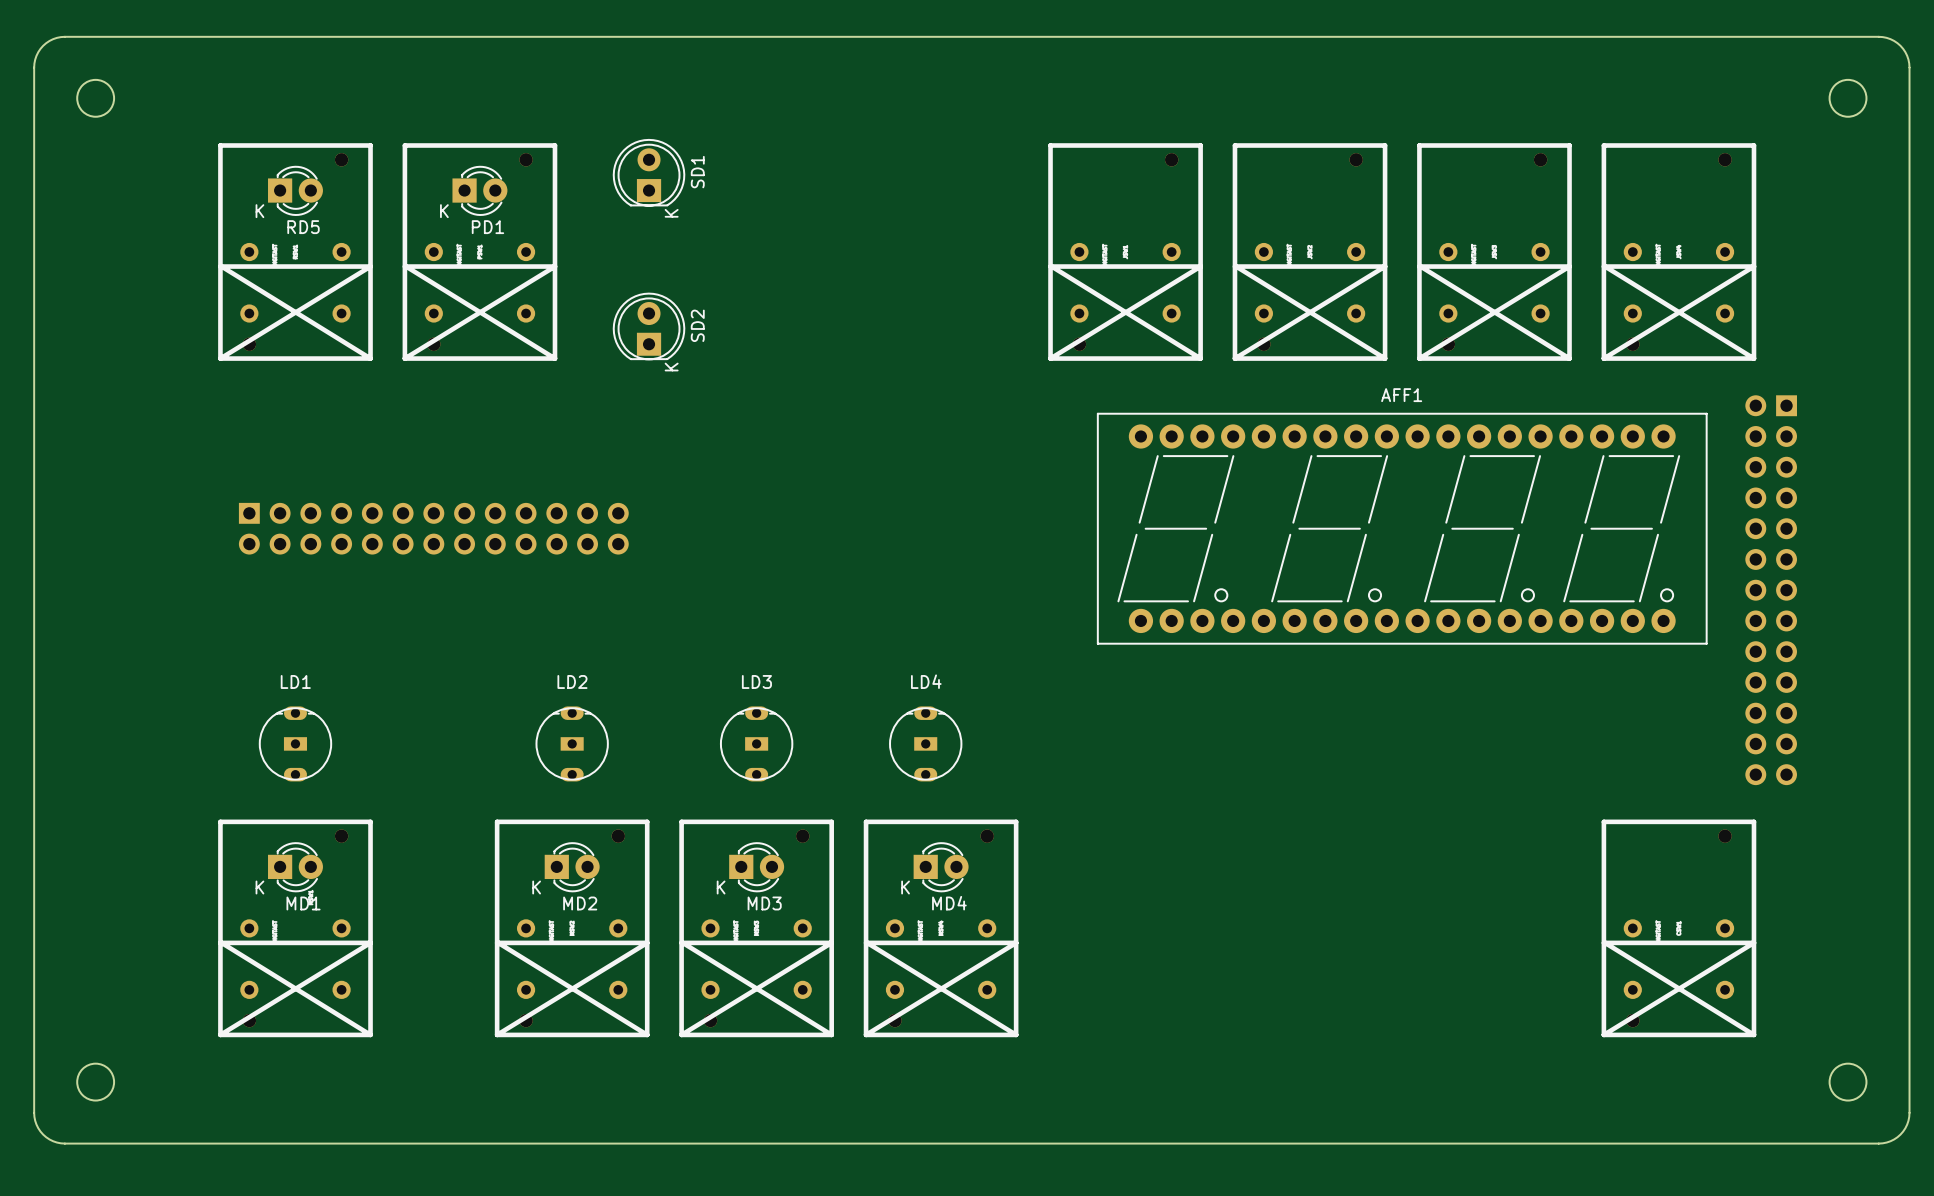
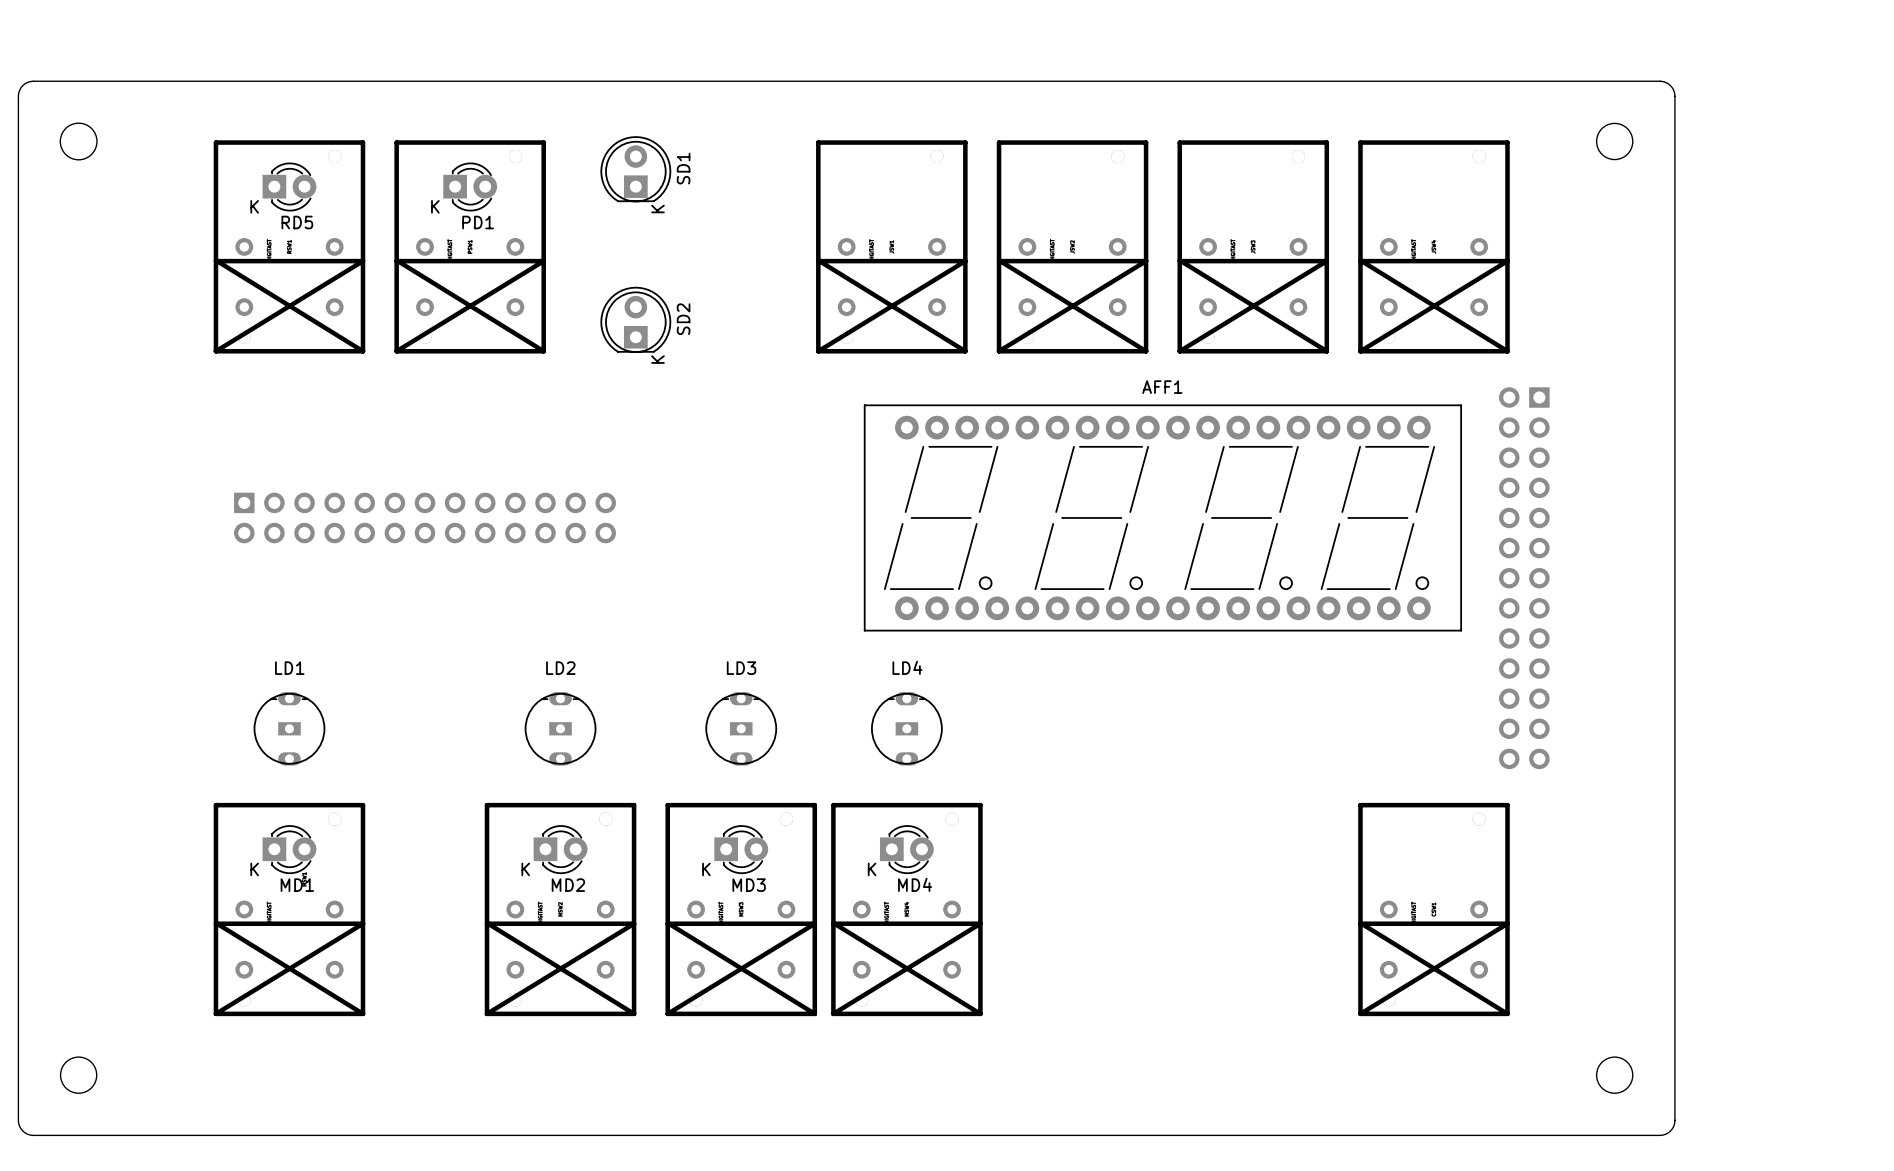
board edge: (64, 36) (1878, 36) (1894, 40) (1905, 52) (1909, 67) (1909, 1112) (1905, 1128) (1894, 1139) (1878, 1143) (64, 1143) (49, 1139) (38, 1128) (34, 1112) (34, 67) (36, 55) (43, 45) (53, 39) (64, 36) -> (33, 81) (1659, 81) (1667, 83) (1672, 88) (1674, 96) (1674, 1120) (1672, 1127) (1667, 1133) (1659, 1135) (33, 1135) (25, 1133) (20, 1127) (18, 1120) (18, 96) (22, 85) (33, 81)
round board edge: [76, 79, 115, 118] -> none
round board edge position: (1848, 98) -> (1614, 141)
round board edge: none -> [59, 122, 98, 161]
part position: (1125, 252) -> (891, 246)
part position: (1310, 252) -> (1072, 246)
part position: (1494, 252) -> (1253, 246)
part position: (1678, 252) -> (1433, 246)
AFF1 position: (1402, 528) -> (1162, 517)
part position: (1771, 590) -> (1524, 578)
MD4 position: (941, 867) -> (906, 849)
part position: (941, 928) -> (906, 909)
part position: (1678, 928) -> (1433, 909)
round board edge position: (95, 1082) -> (78, 1075)
round board edge position: (1848, 1082) -> (1614, 1075)

